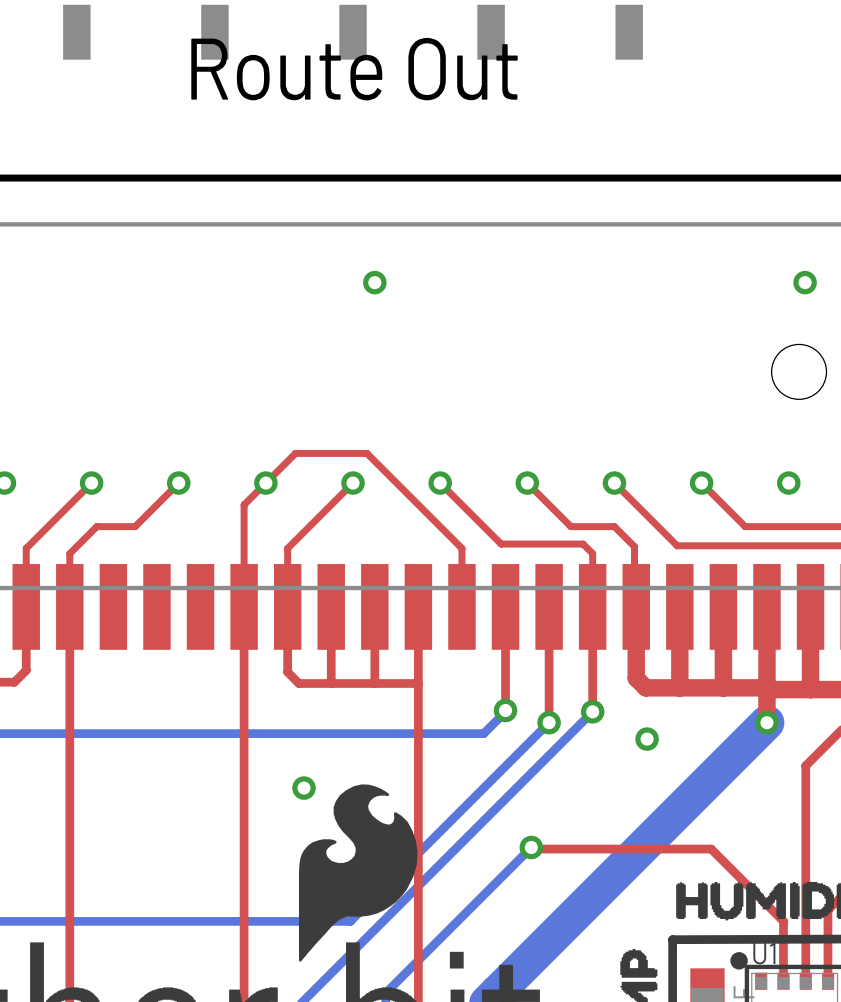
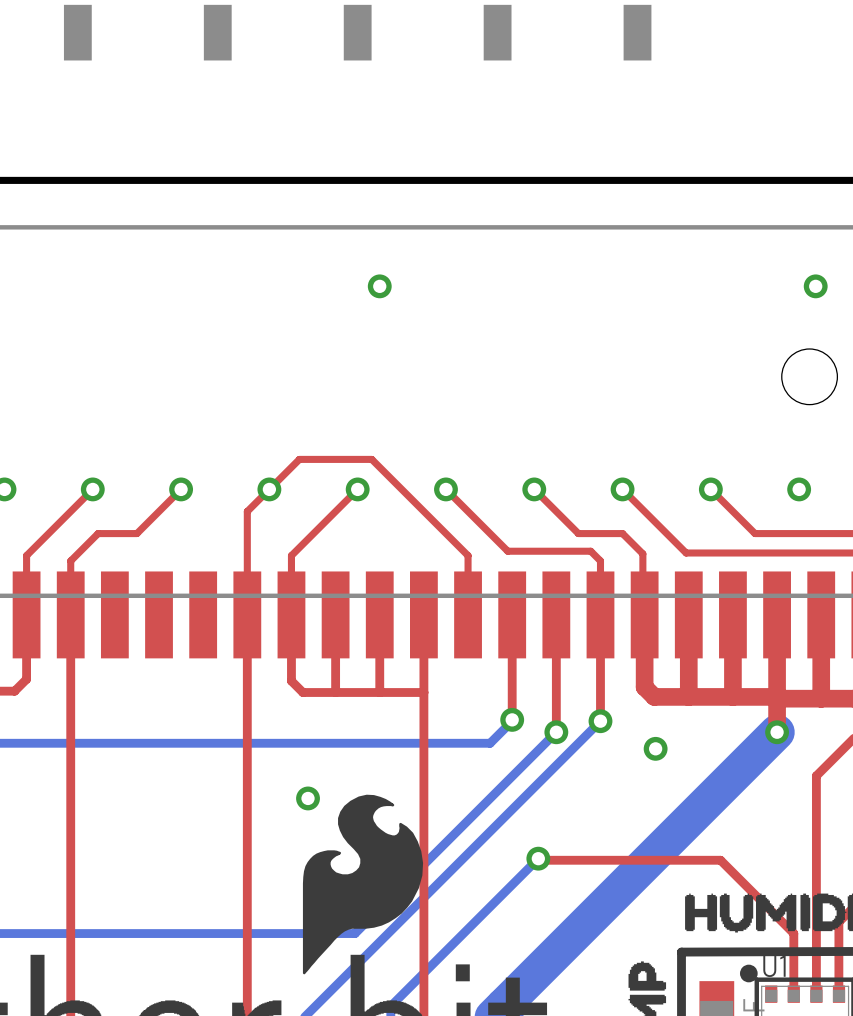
text: Route Out (354, 69) -> none

